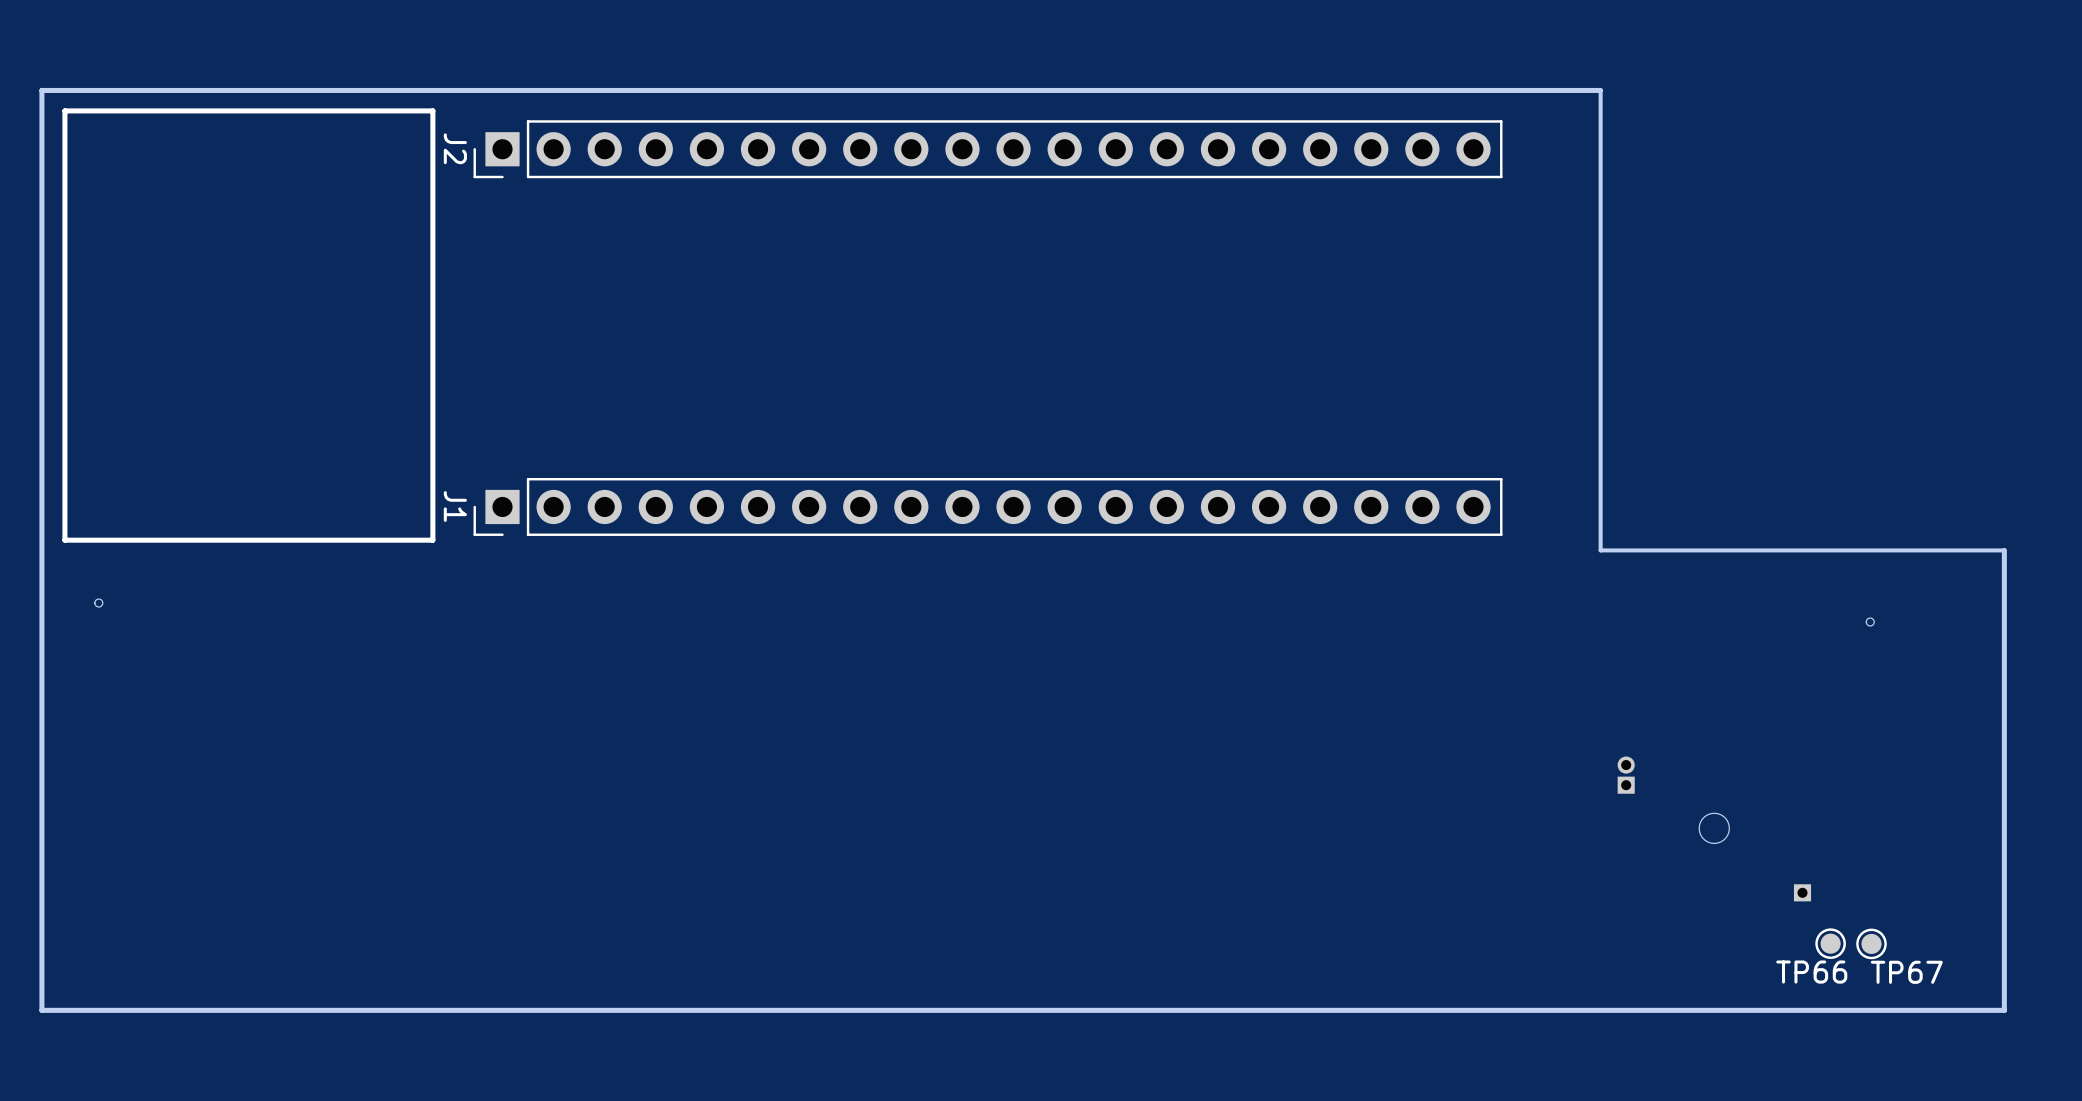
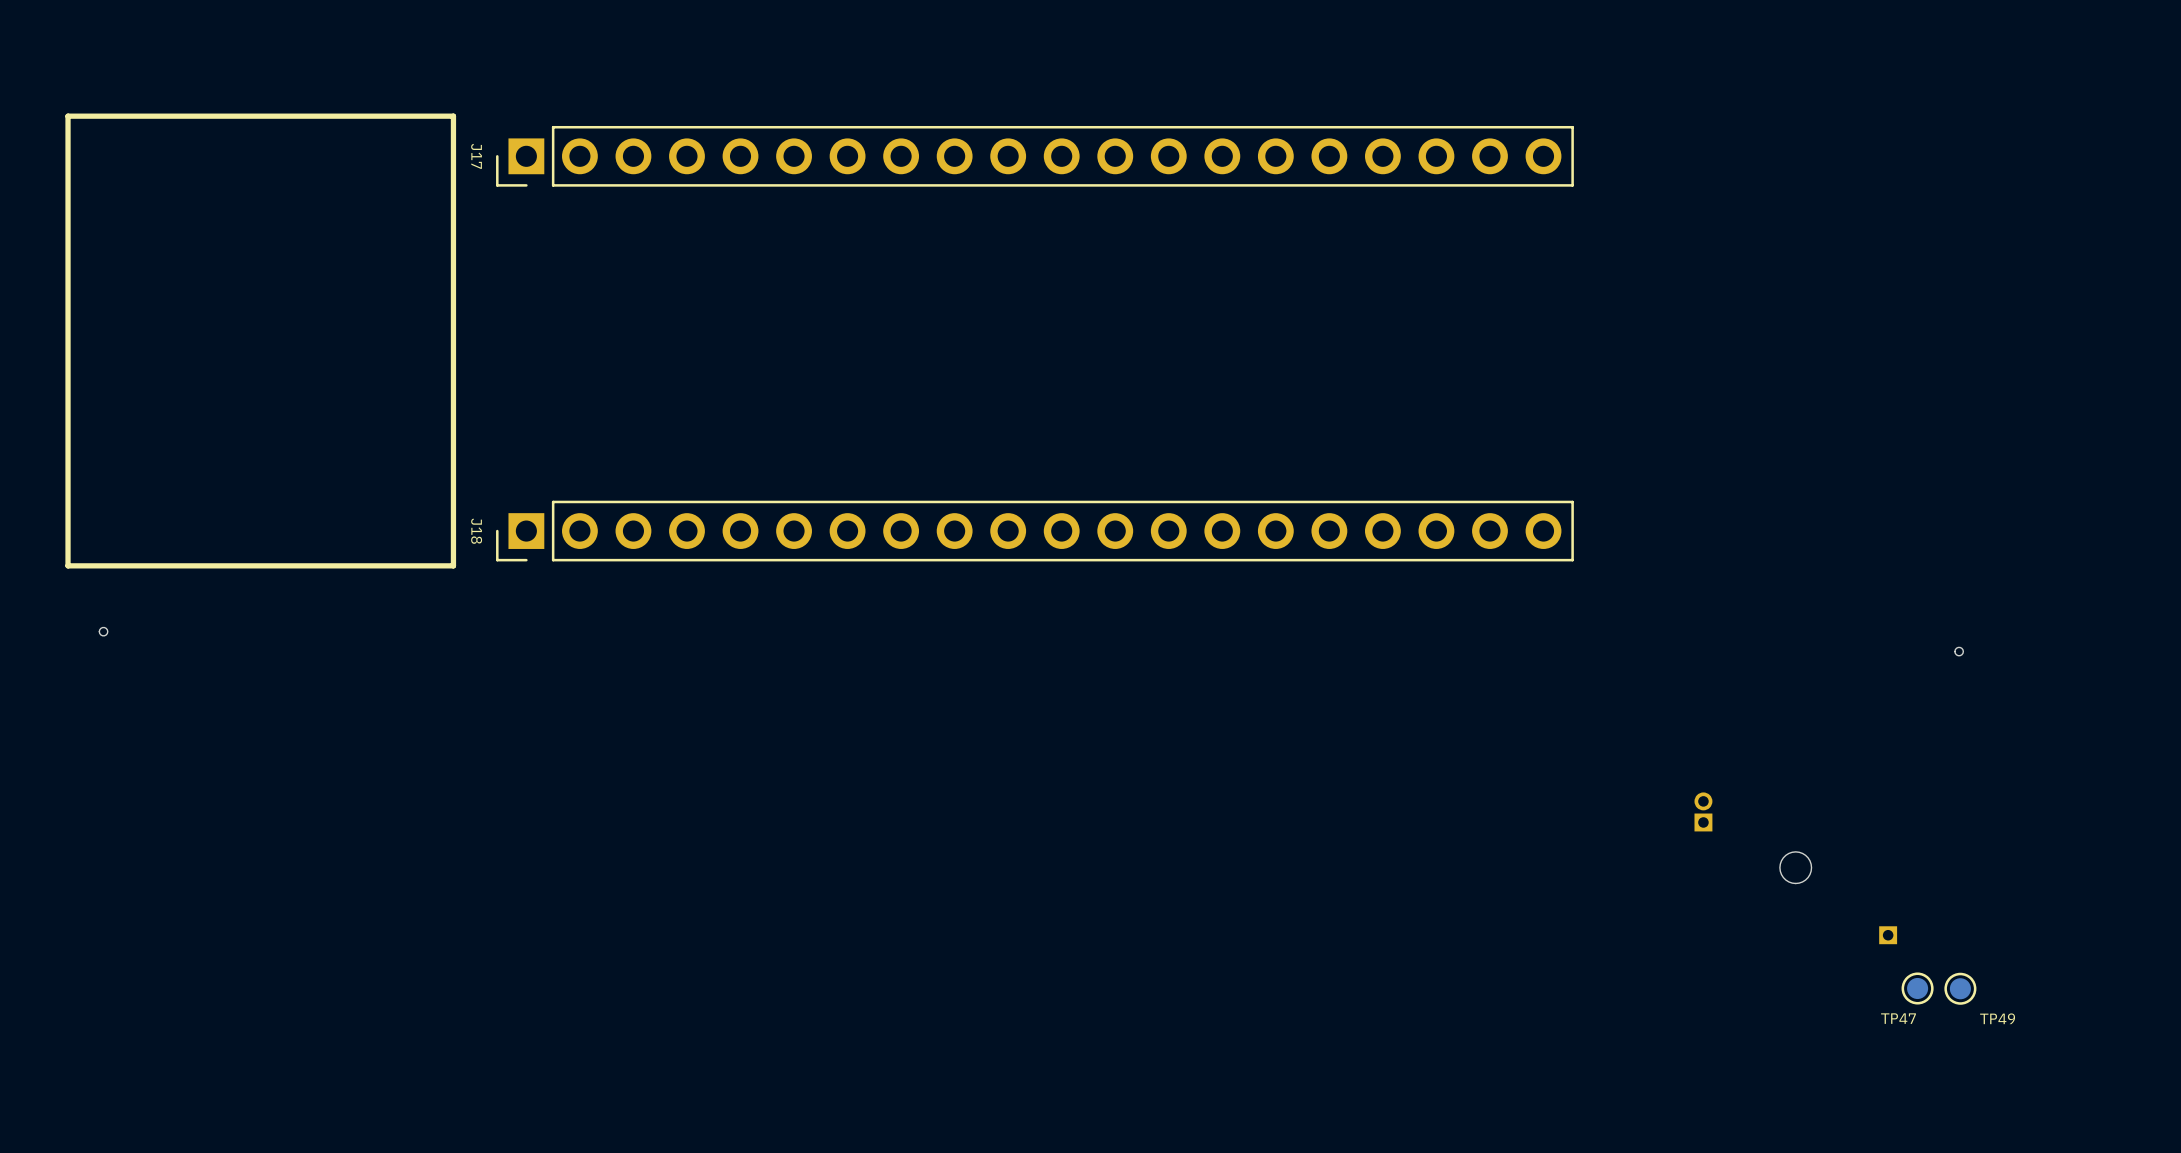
board edge: (1600, 90) (41, 90) (41, 1010) (2004, 1010) (2004, 550) (1600, 550) (1600, 90) -> none
J2 name: J2 (455, 148) -> J17 (476, 156)
J1 name: J1 (455, 506) -> J18 (476, 531)
TP66 name: TP66 (1811, 972) -> TP47 (1898, 1018)
TP67 name: TP67 (1906, 972) -> TP49 (1997, 1018)

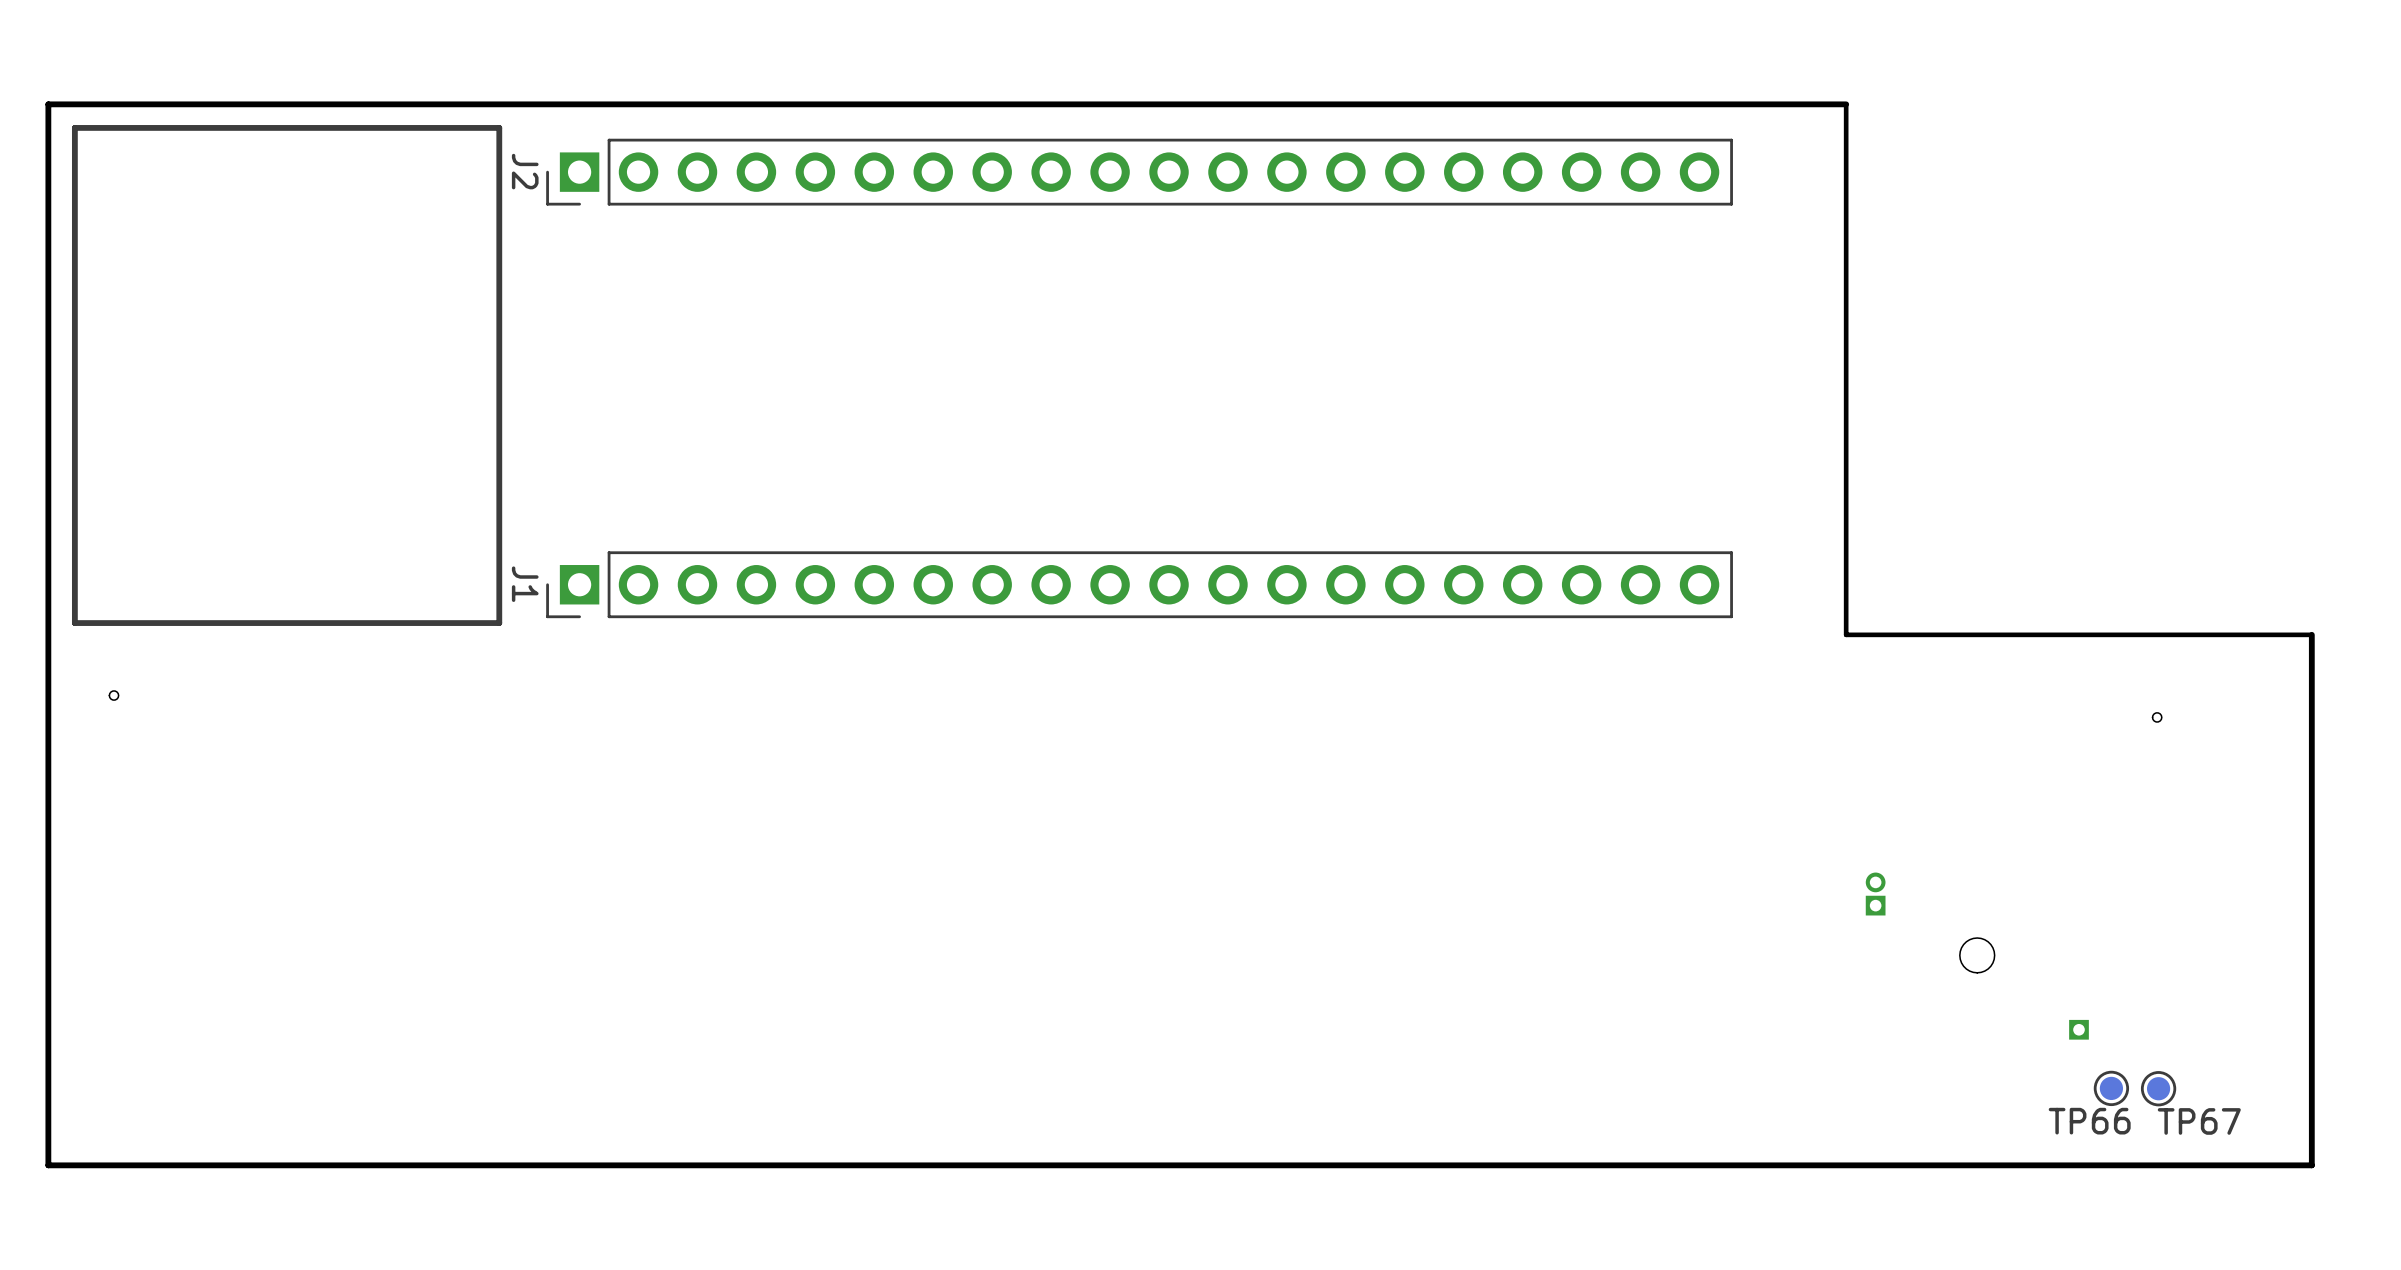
board edge: none -> (1846, 104) (48, 104) (48, 1165) (2311, 1165) (2311, 634) (1846, 634) (1846, 104)
J17 name: J17 (476, 156) -> J2 (525, 171)
J18 name: J18 (476, 531) -> J1 (525, 584)
TP47 name: TP47 (1898, 1018) -> TP66 (2089, 1121)
TP49 name: TP49 (1997, 1018) -> TP67 (2199, 1121)

